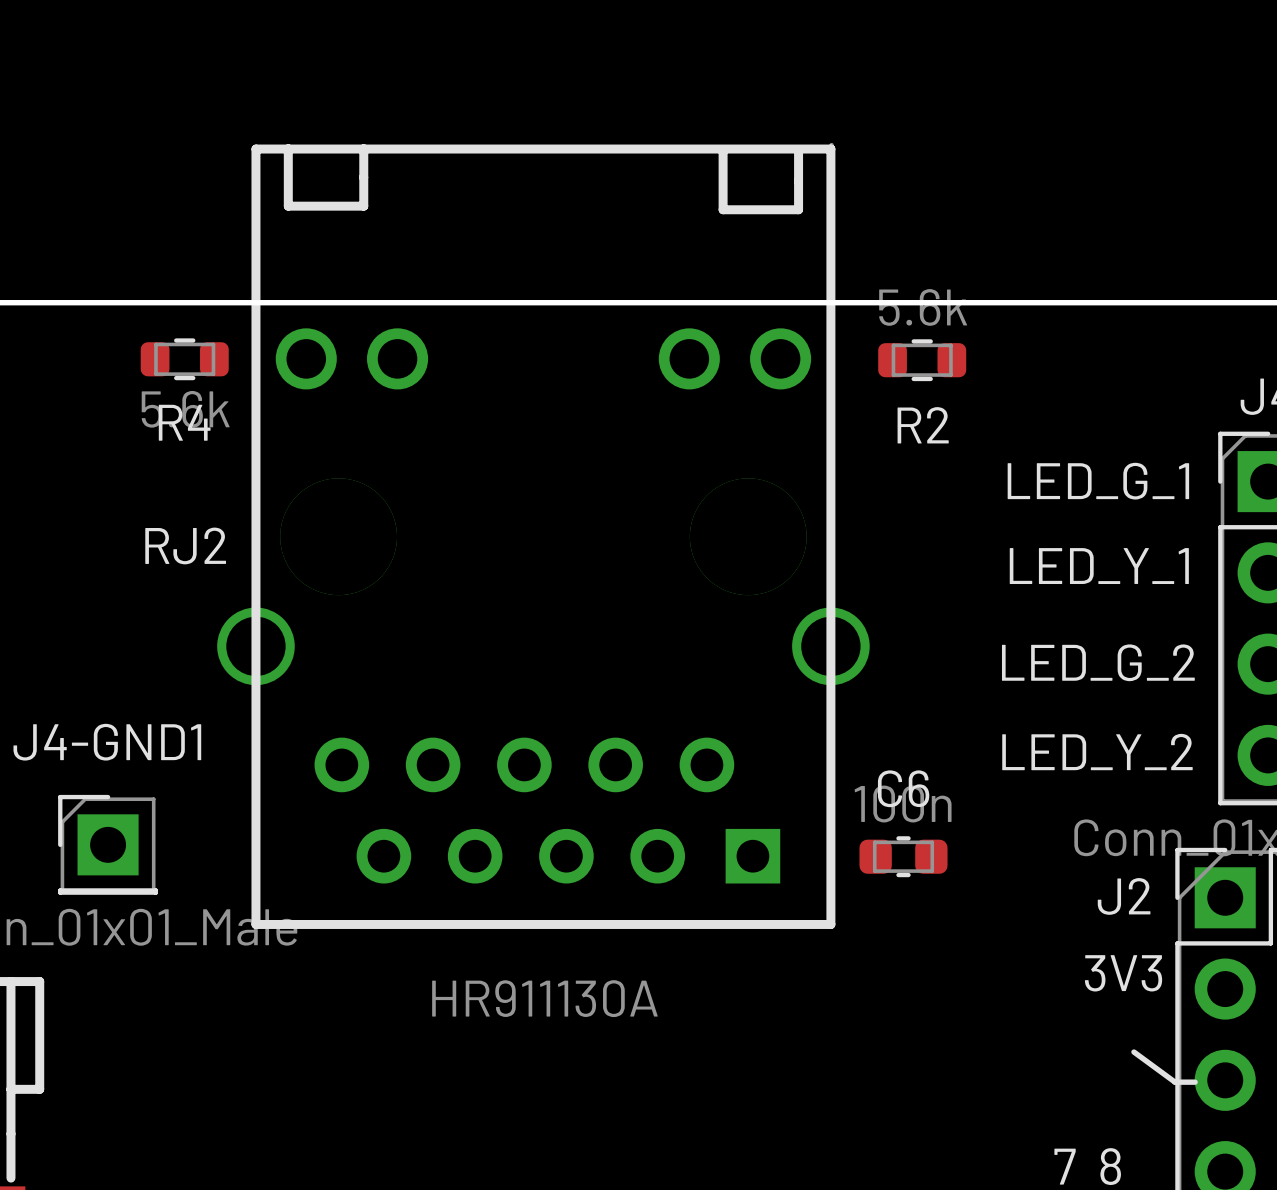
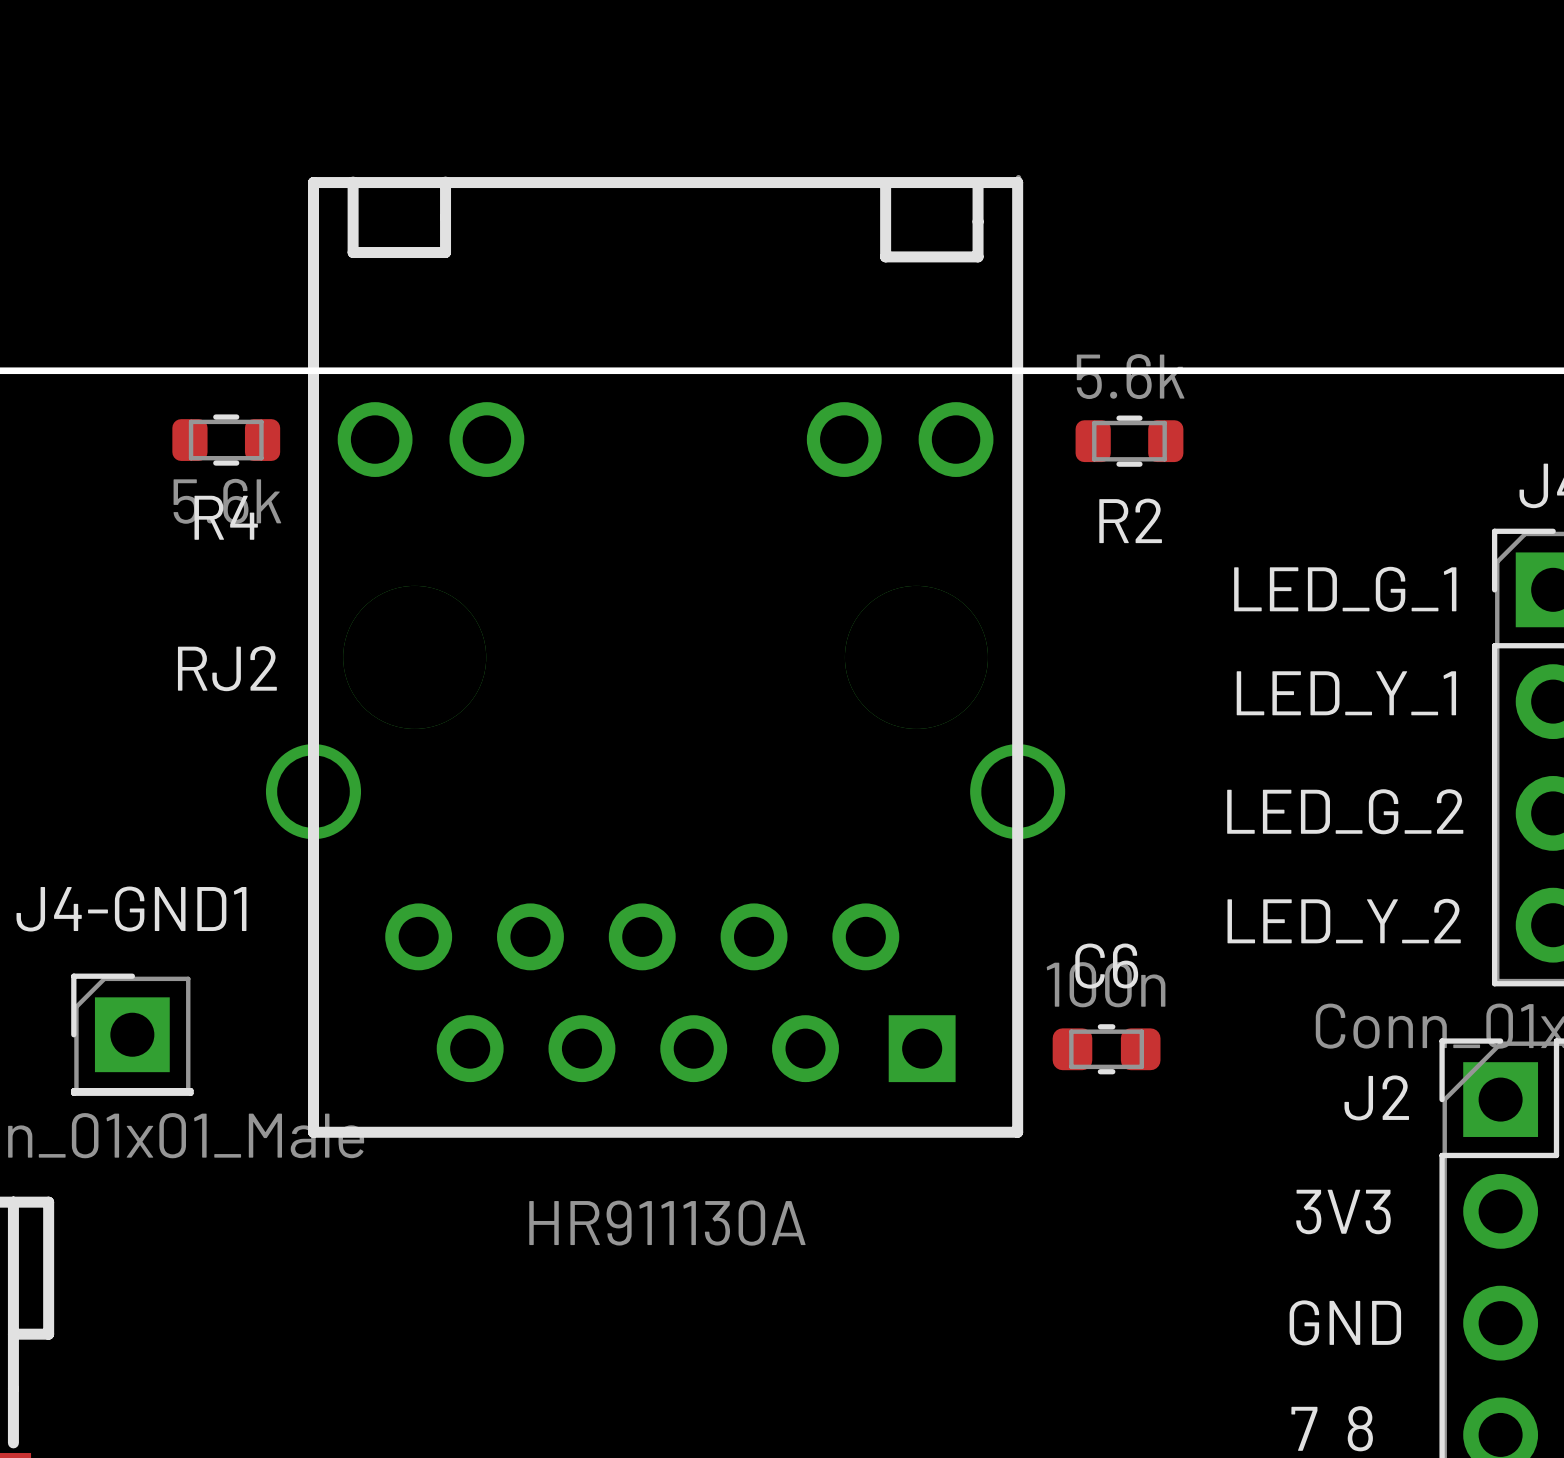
text position: 3V3 (1123, 973) -> 3V3 (1343, 1211)
line: (1133, 1052) (1175, 1082) (1195, 1082) -> none
text: none -> GND (1345, 1322)

